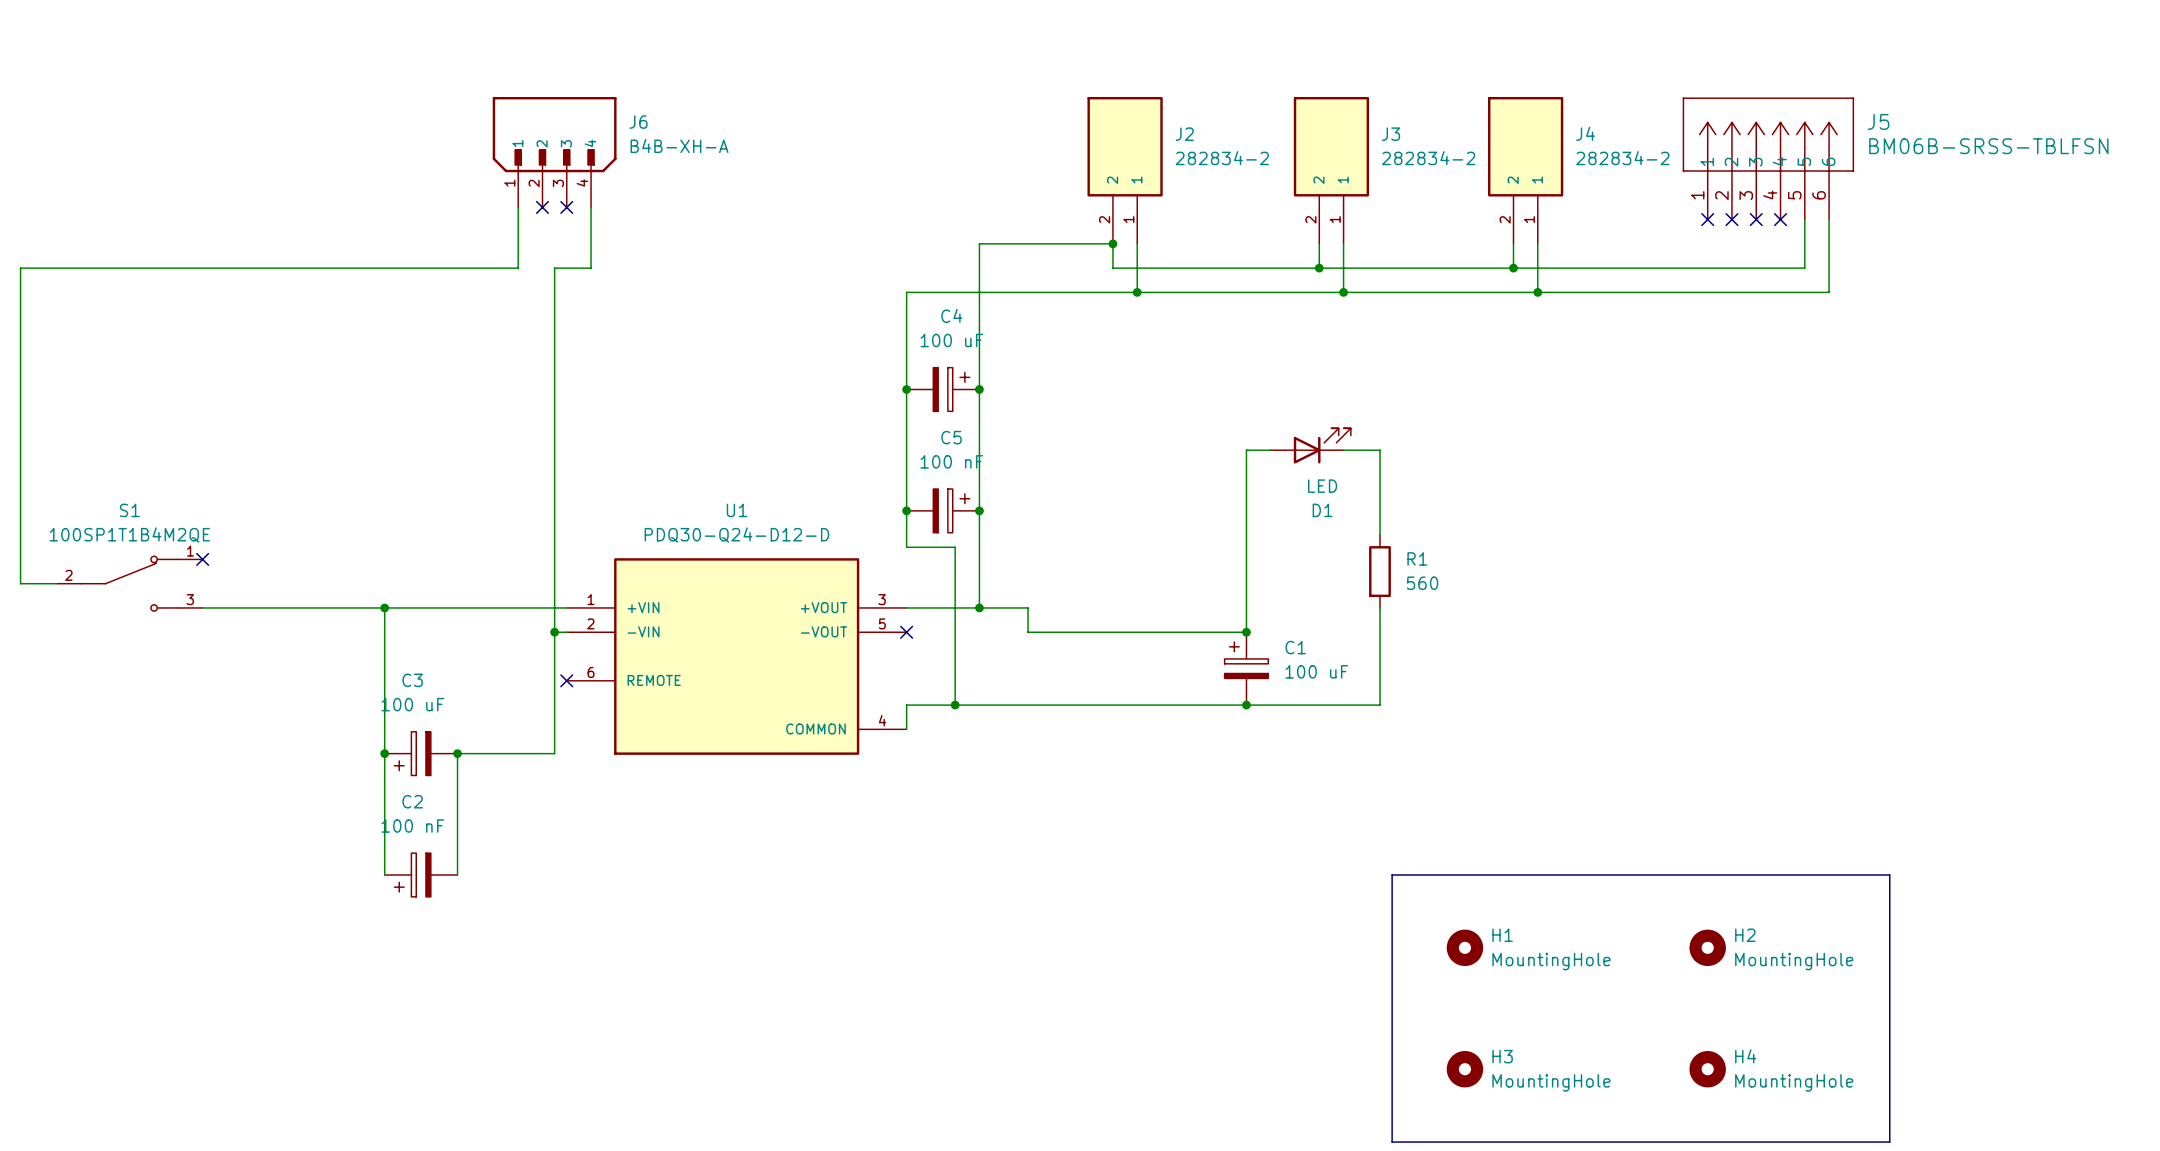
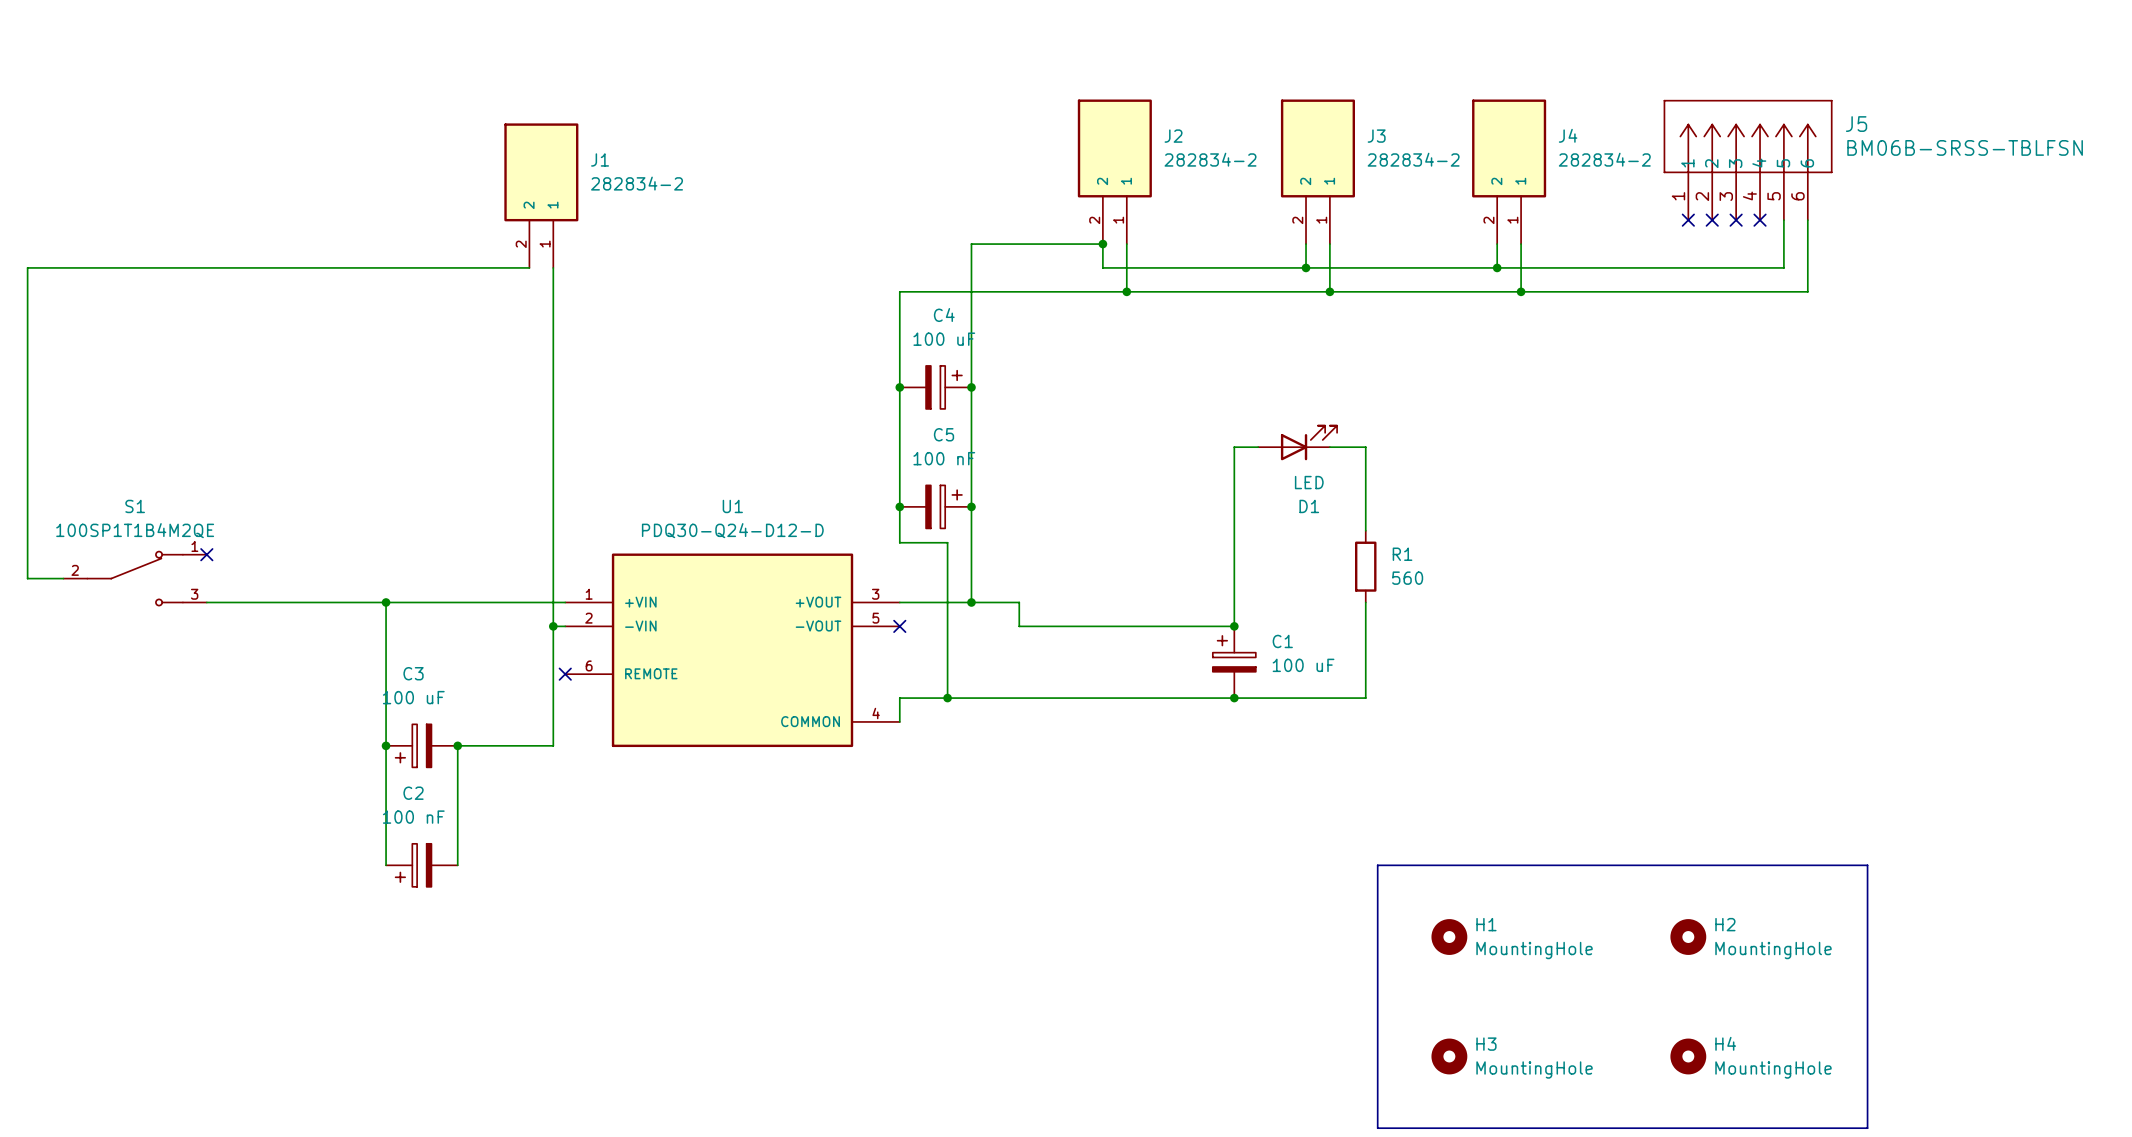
J6: B4B-XH-A (554, 152) -> none
J1: none -> 282834-2 (541, 195)
wire: (518, 207) (518, 268) -> (529, 267) (517, 267)
no-connect mark: (542, 207) -> none
no-connect mark: (566, 207) -> none
wire: (591, 207) (591, 268) (554, 268) -> none

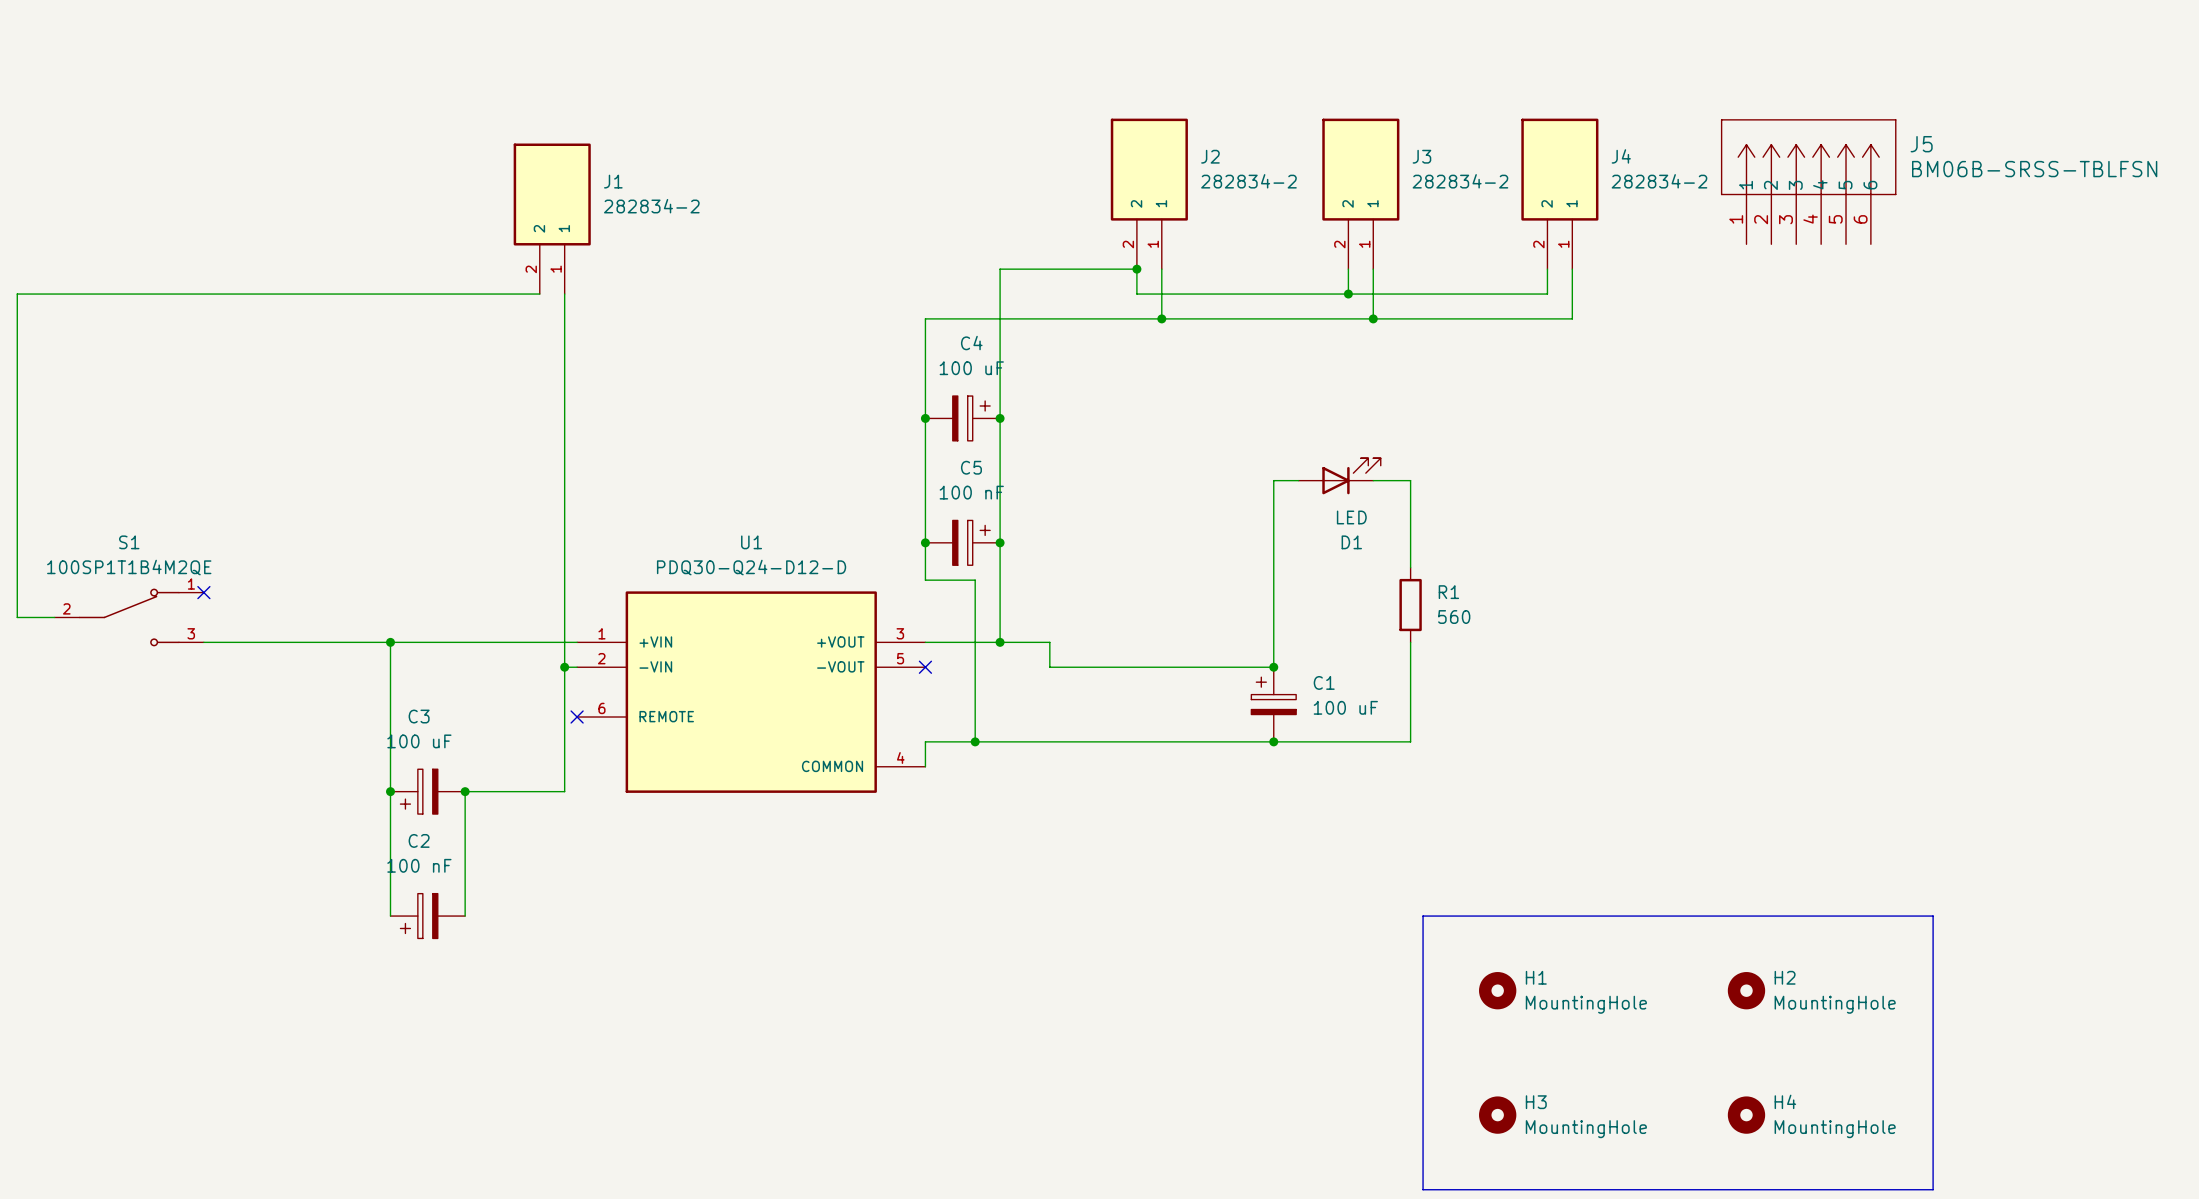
no-connect mark: (1688, 220) -> none
no-connect mark: (1712, 220) -> none
no-connect mark: (1736, 220) -> none
no-connect mark: (1760, 220) -> none
wire: (1783, 220) (1783, 267) (1497, 267) -> none
wire: (1807, 220) (1807, 291) (1521, 291) -> none
junction: (1497, 267) -> none
junction: (1521, 291) -> none

